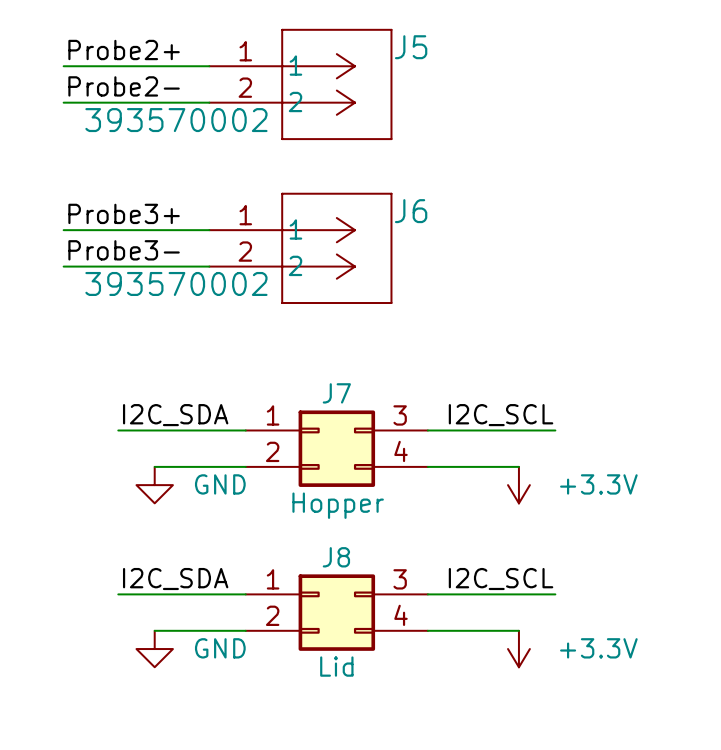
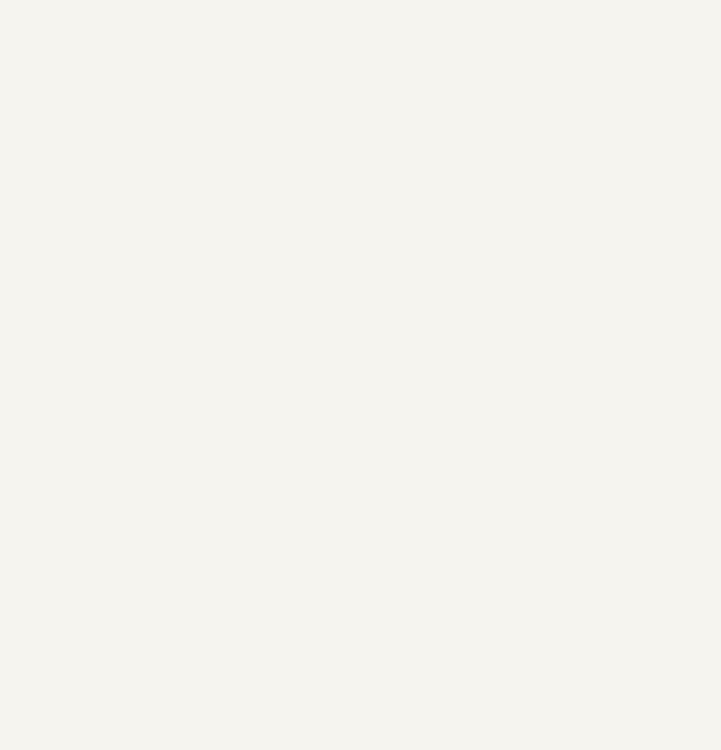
label: Probe2+ (124, 49) -> none
wire: (63, 66) (209, 66) -> none
J5: 393570002 (300, 84) -> none
label: Probe2- (124, 86) -> none
wire: (63, 102) (209, 102) -> none
label: Probe3+ (124, 213) -> none
wire: (63, 230) (209, 230) -> none
J6: 393570002 (300, 248) -> none
label: Probe3- (124, 250) -> none
wire: (63, 266) (209, 266) -> none
label: I2C_SDA (175, 415) -> none
label: I2C_SCL (501, 415) -> none
wire: (118, 430) (245, 430) -> none
wire: (427, 430) (555, 430) -> none
J7: Hopper (336, 448) -> none
wire: (154, 466) (245, 466) -> none
wire: (427, 466) (518, 466) -> none
power symbol: GND (154, 485) -> none
power symbol: +3.3V (518, 485) -> none
label: I2C_SDA (175, 579) -> none
label: I2C_SCL (501, 579) -> none
wire: (118, 594) (245, 594) -> none
wire: (427, 594) (555, 594) -> none
J8: Lid (336, 612) -> none
wire: (154, 630) (245, 630) -> none
wire: (427, 630) (518, 630) -> none
power symbol: GND (154, 649) -> none
power symbol: +3.3V (518, 649) -> none

